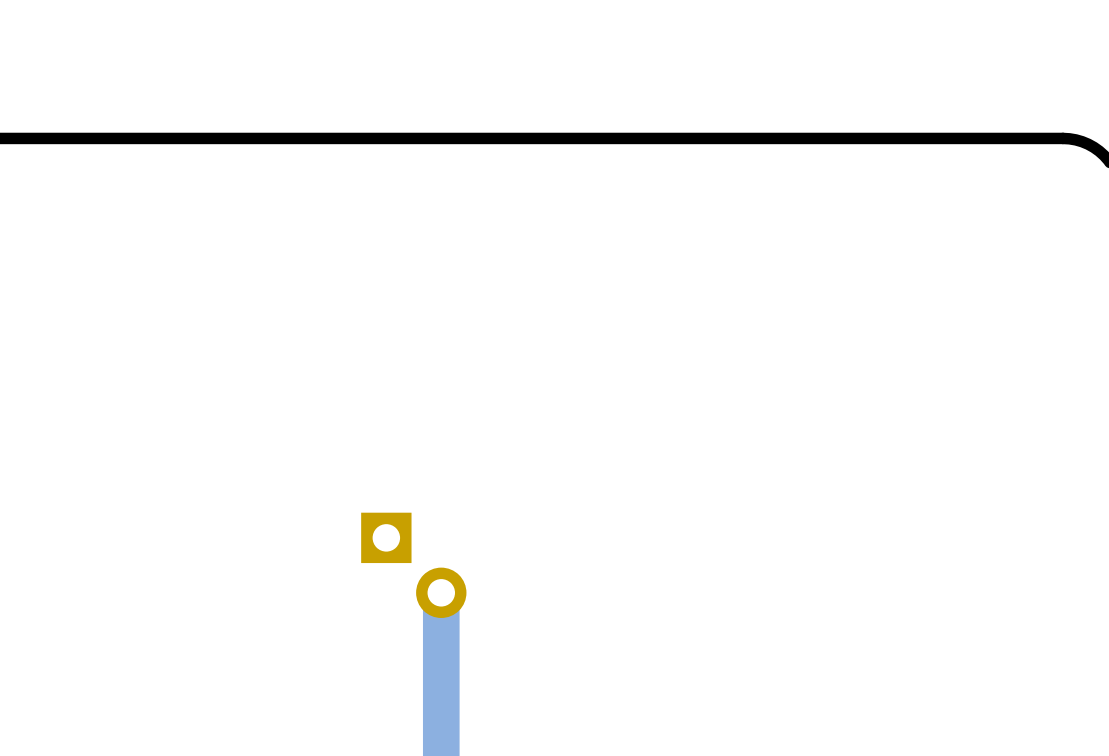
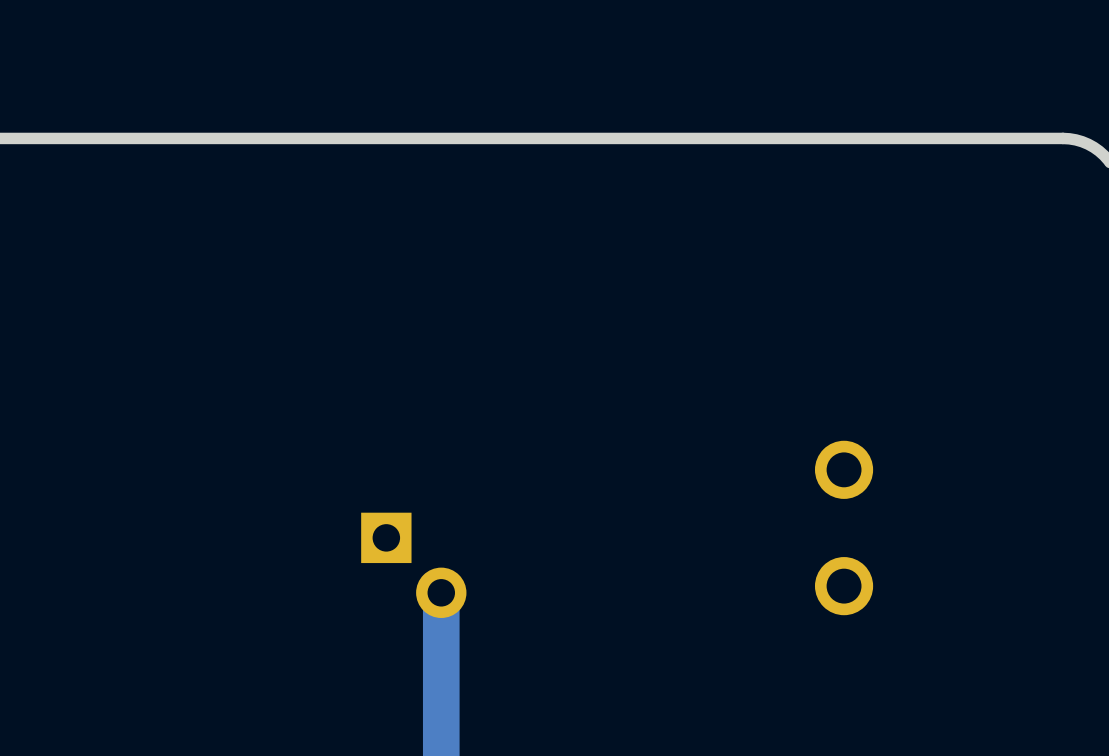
part: none -> (844, 527)

